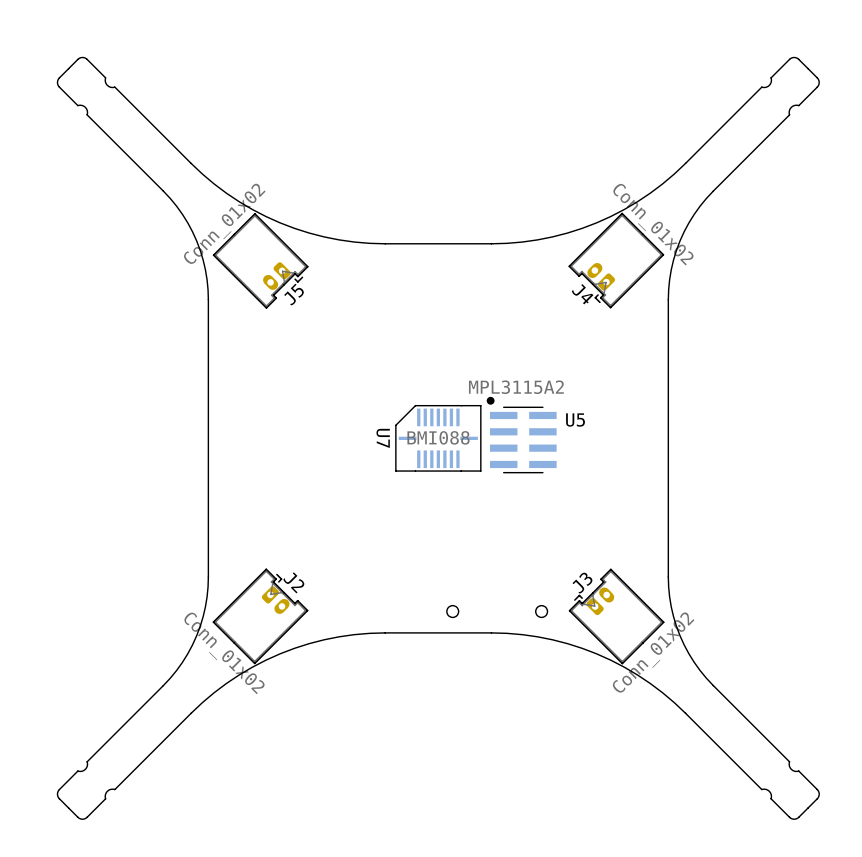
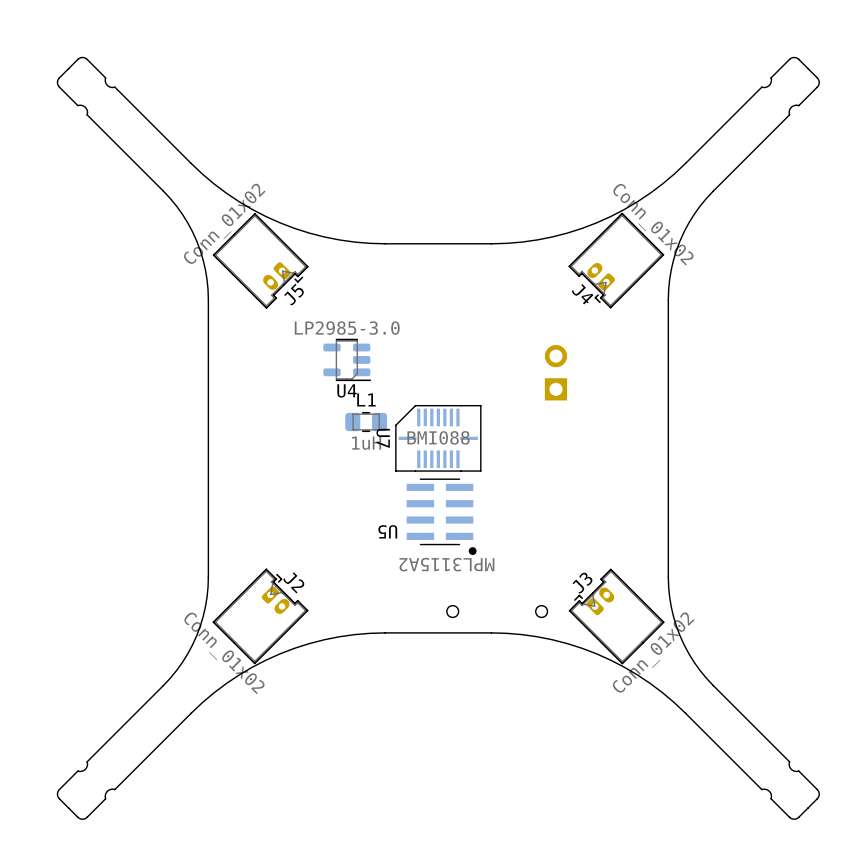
U4: none -> LP2985-3.0 (347, 359)
part: none -> (555, 372)
L1: none -> 1uH (366, 422)
U5 rotation: 0° (521, 435) -> 180° (441, 516)
U5 position: (521, 435) -> (441, 516)

